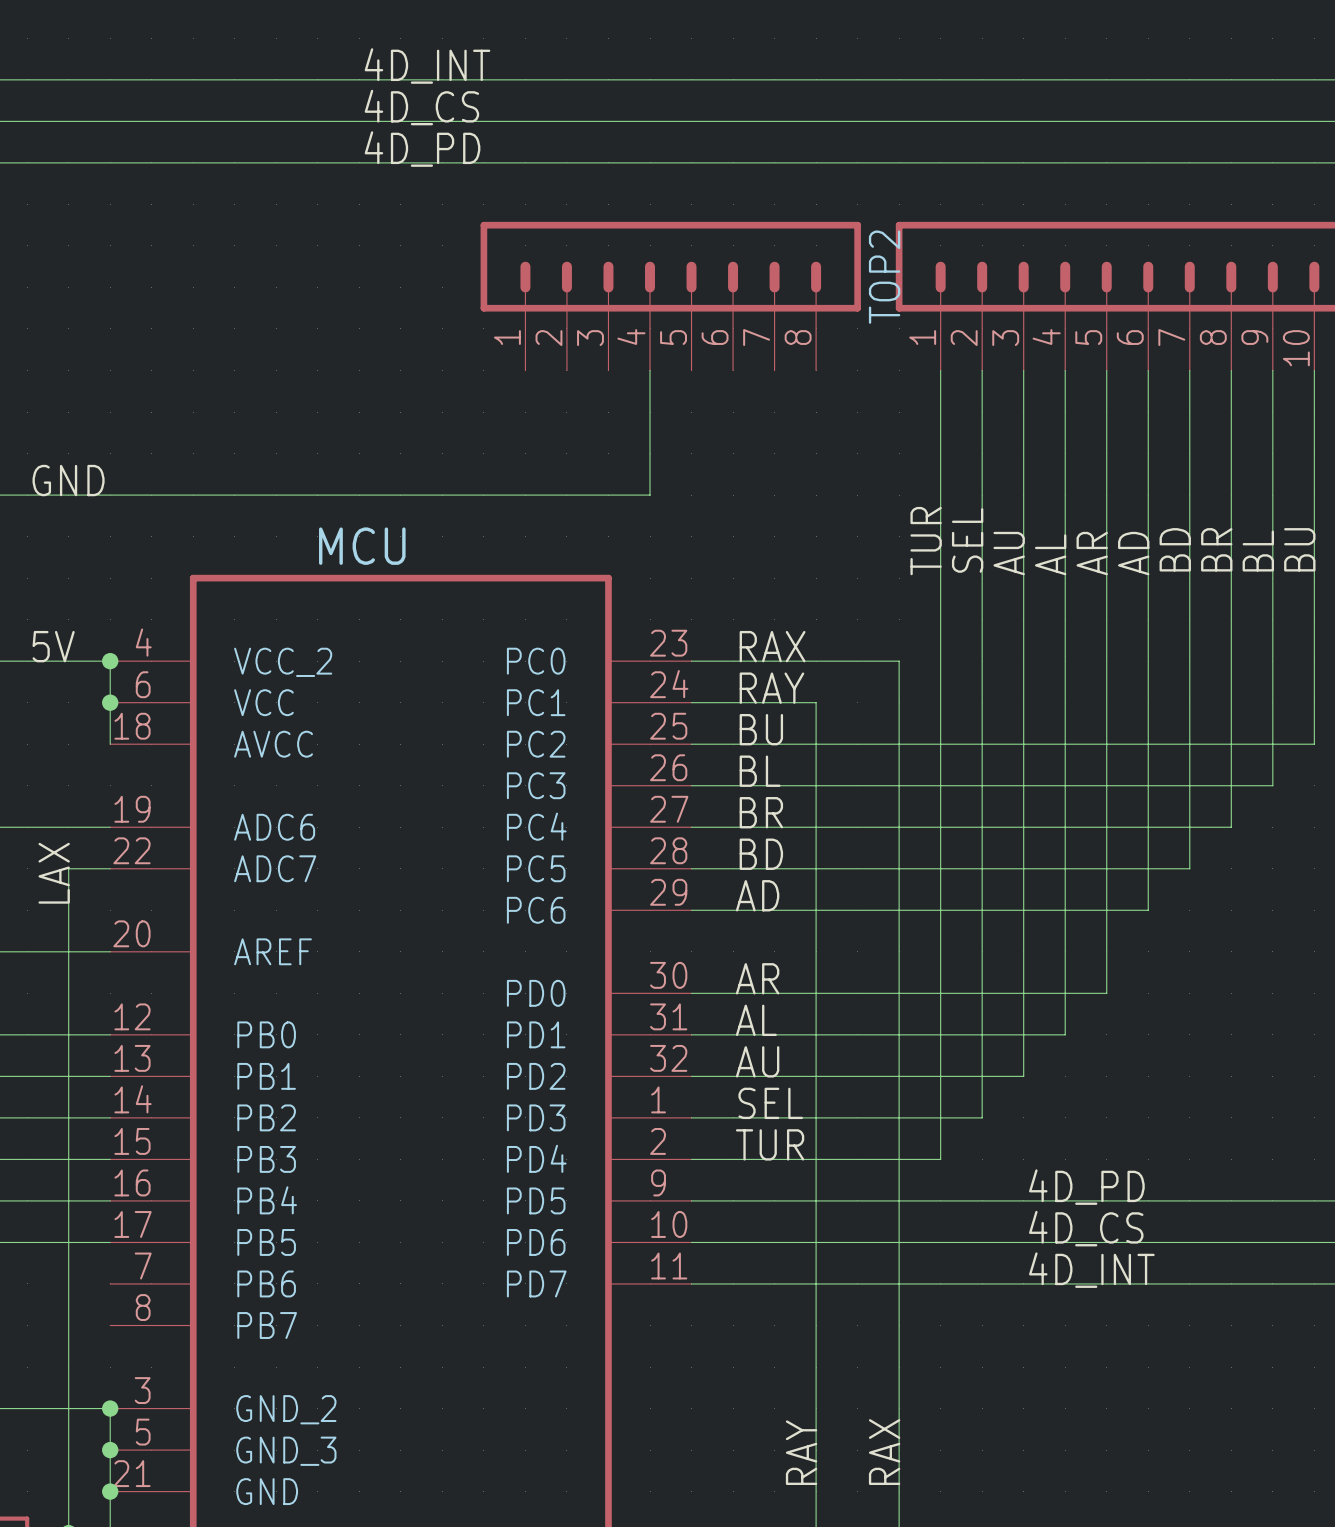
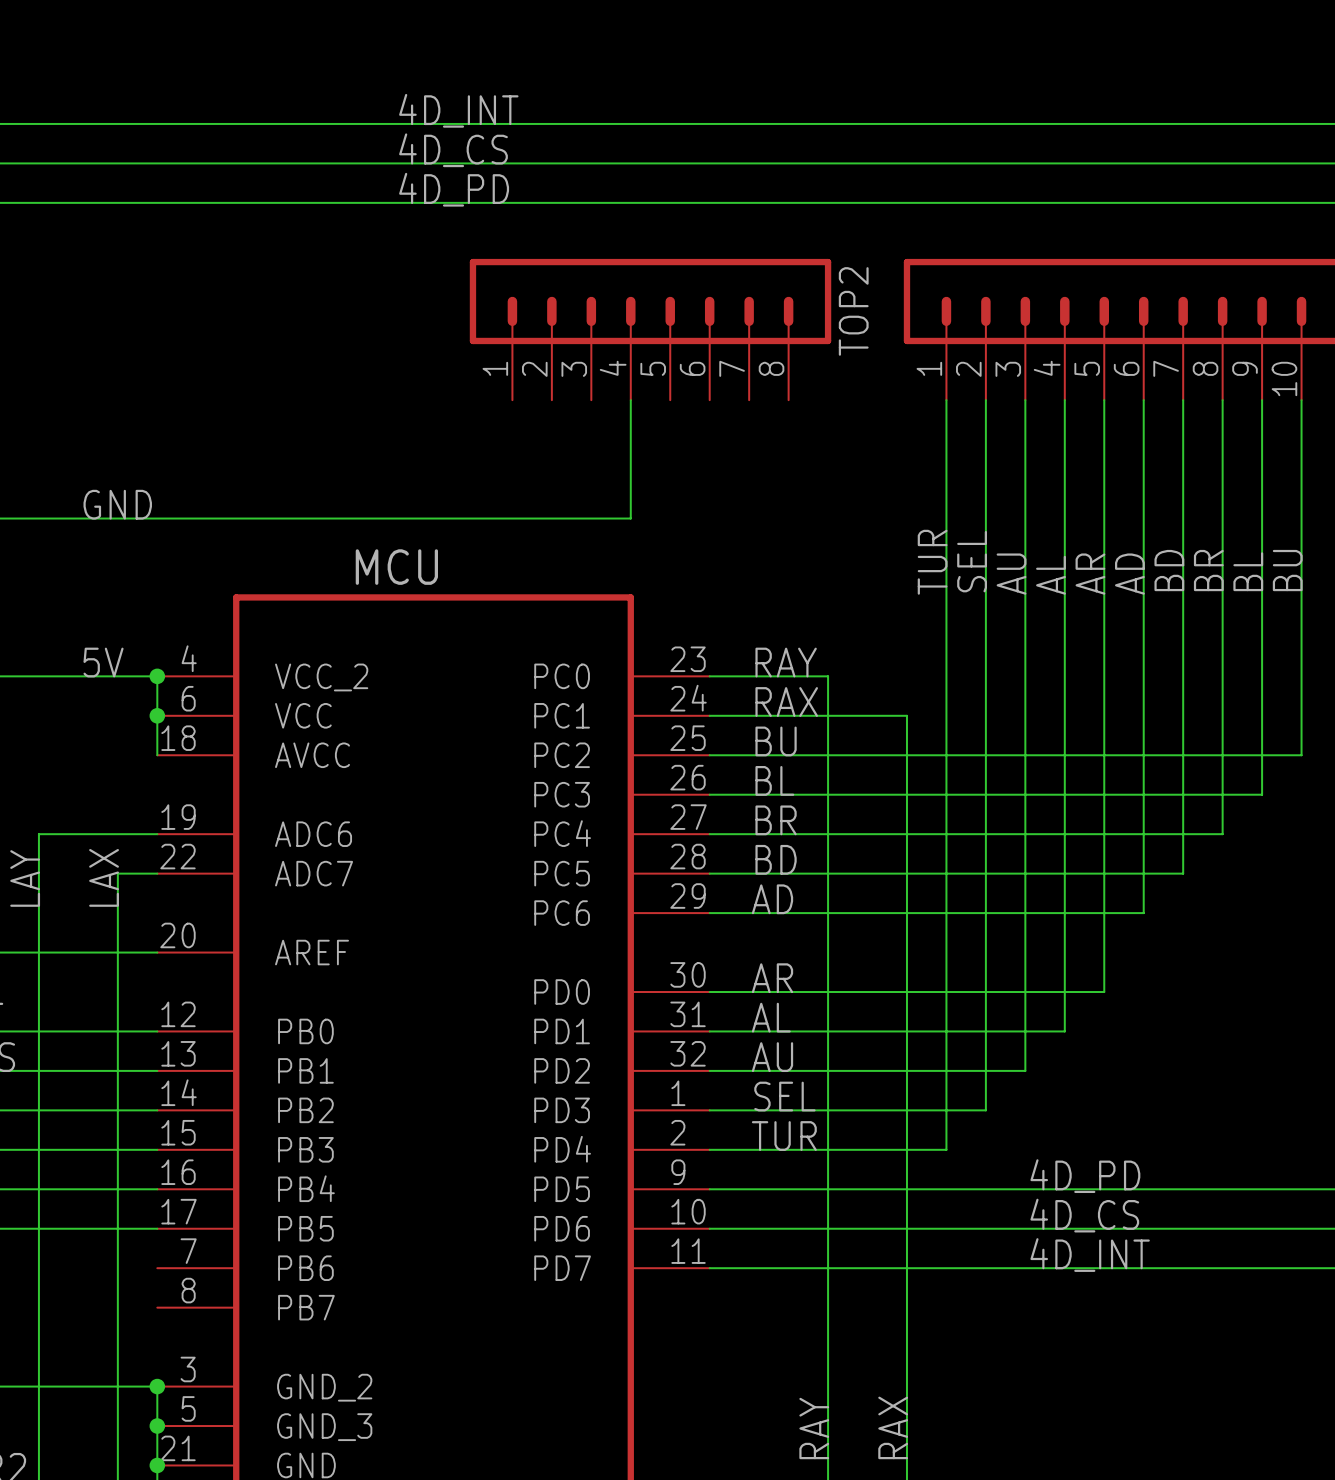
TOP2 position: (670, 296) -> (650, 329)
wire: (650, 370) (650, 495) (608, 495) -> (630, 400) (630, 518)
label: RAX (772, 646) -> RAY (786, 662)
wire: (816, 661) (899, 661) (899, 702) -> (828, 676) (828, 715) (906, 715)
label: RAY (771, 688) -> RAX (786, 701)

